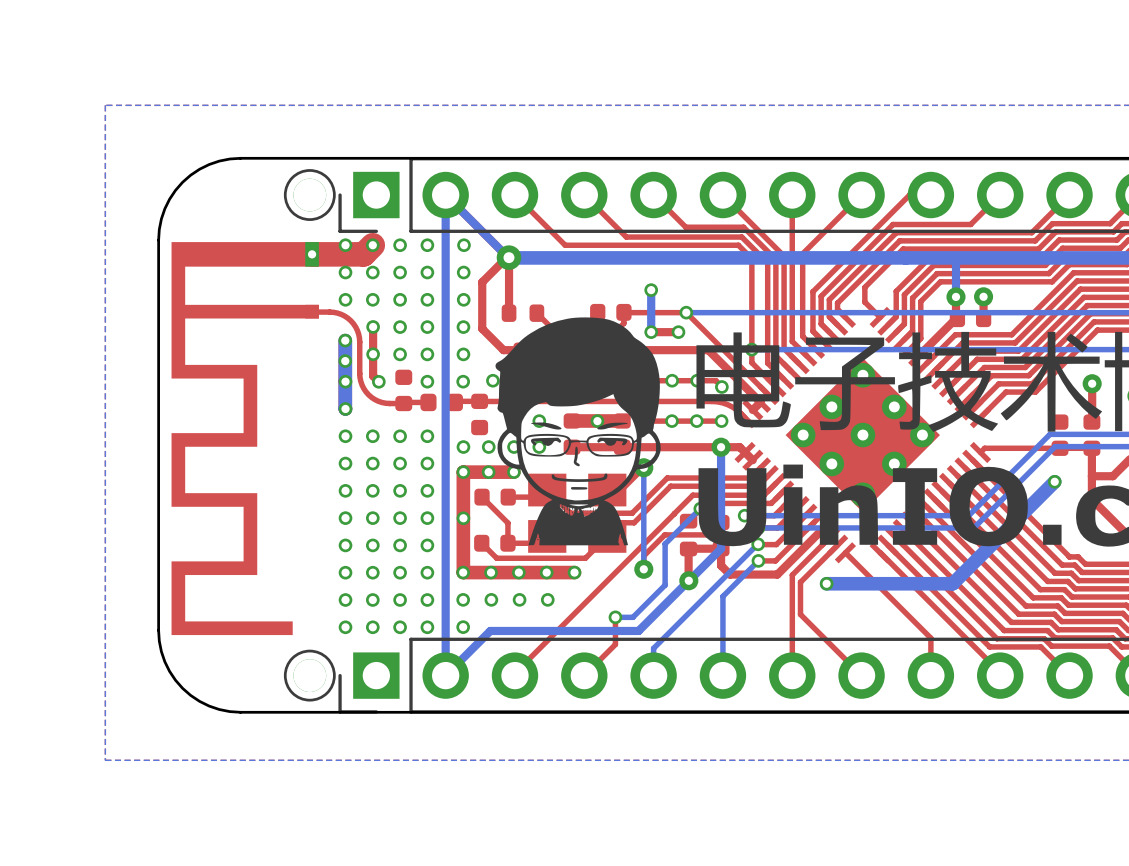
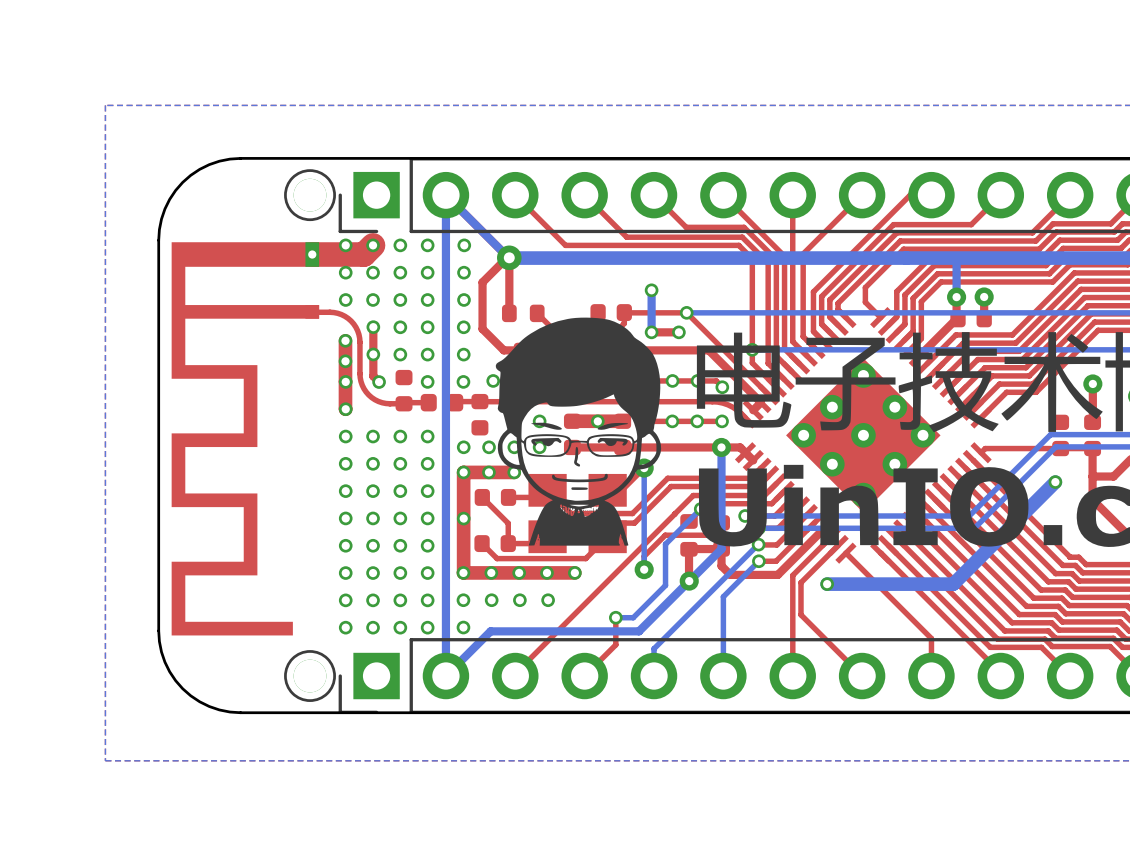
bottom track: (345, 340) (345, 408) -> none

